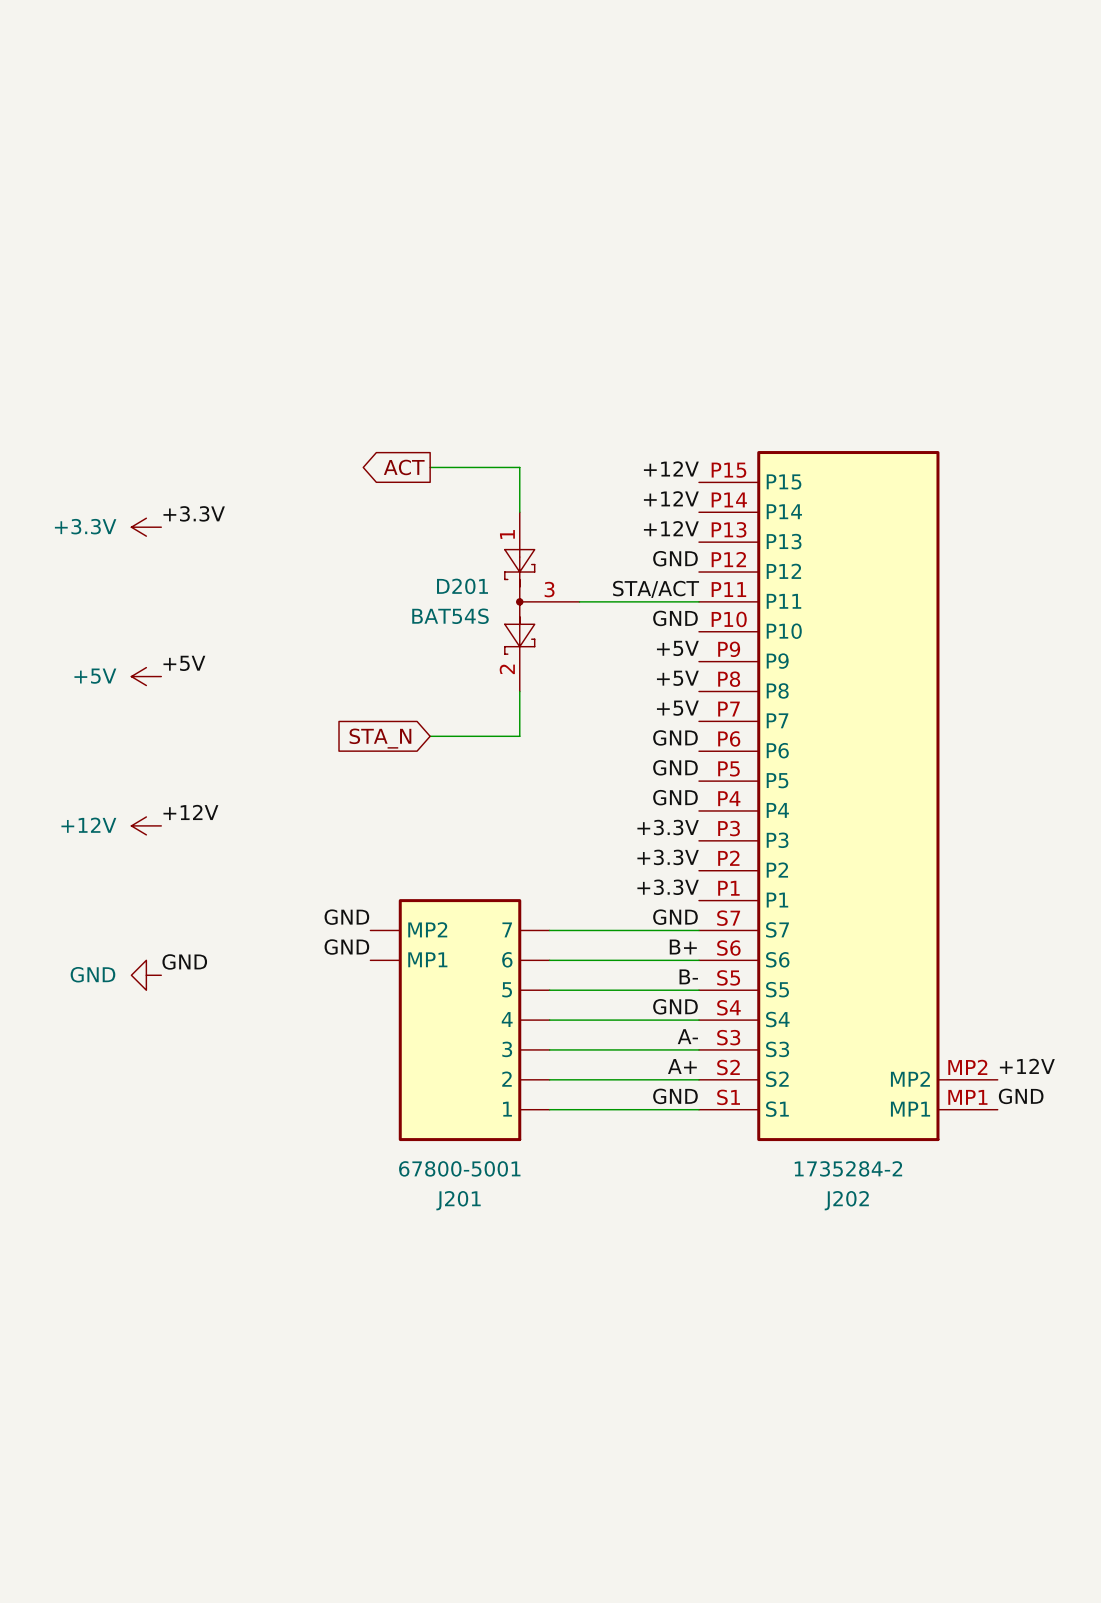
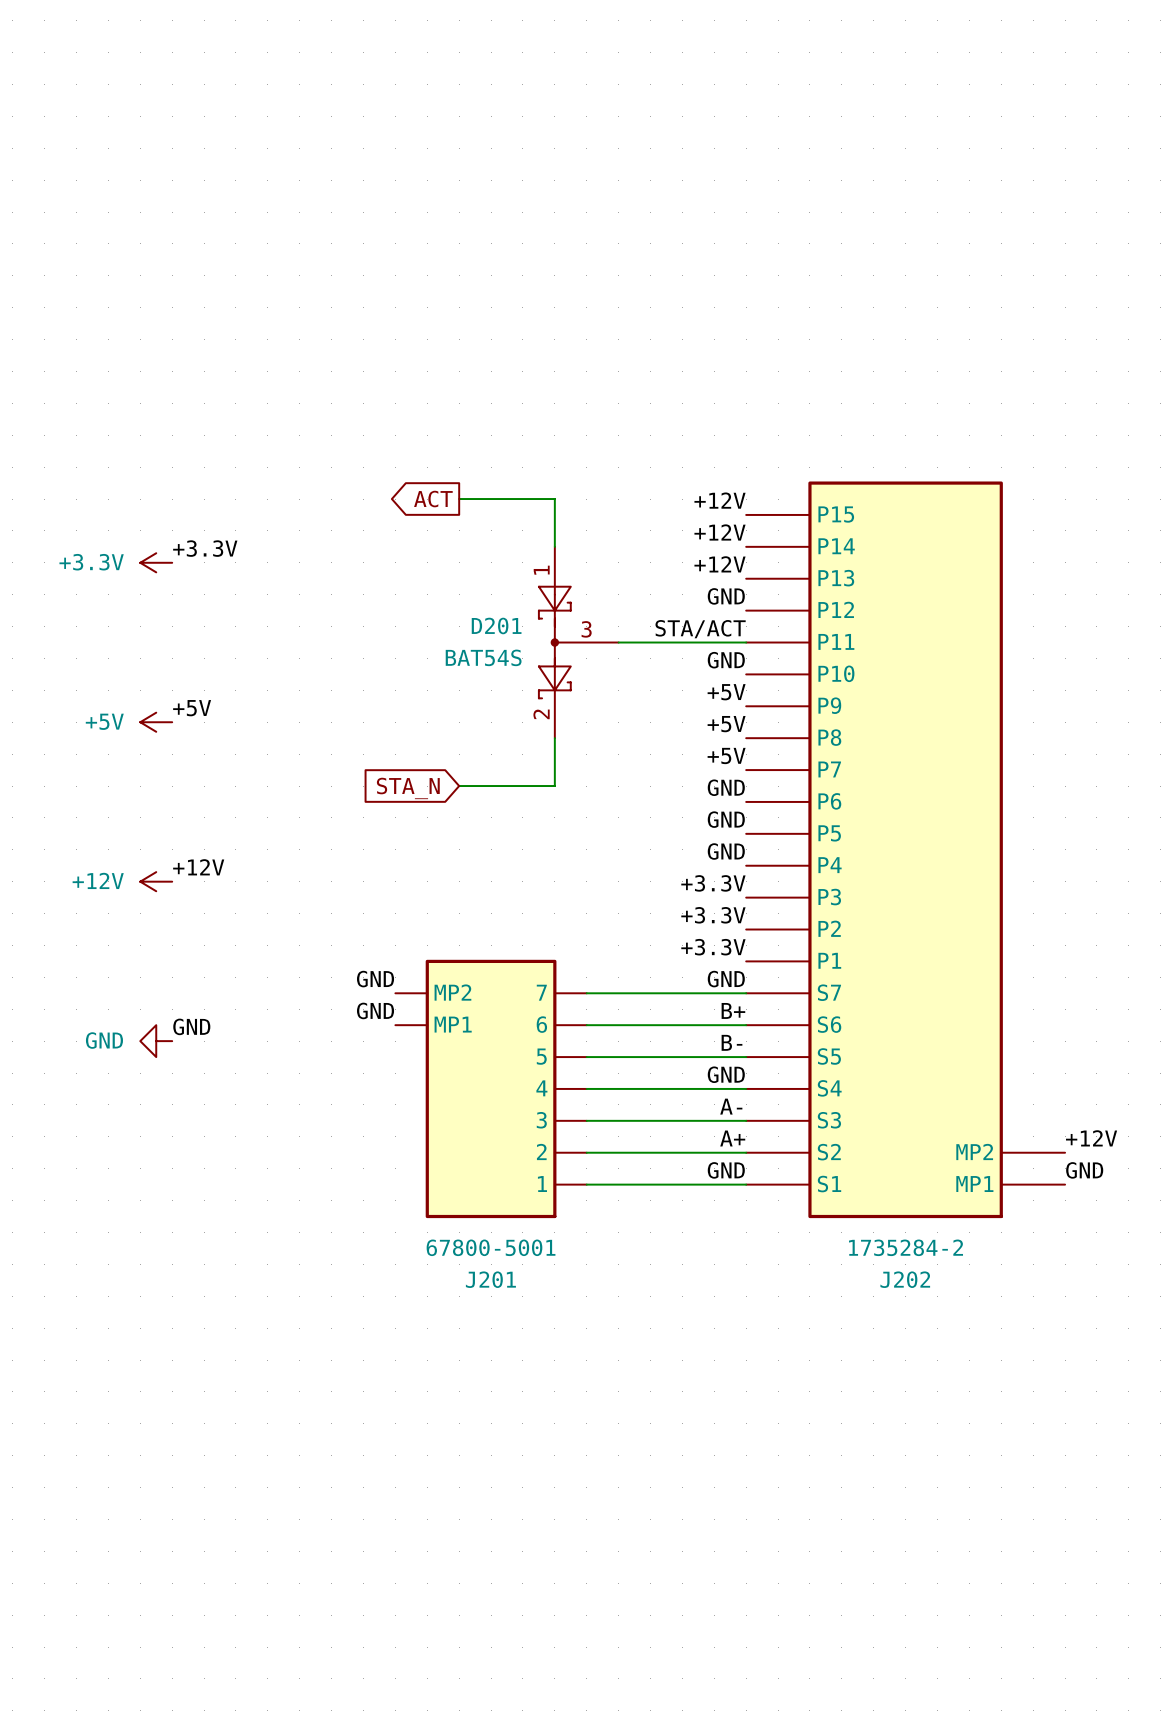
J202 symbol: [698, 451, 998, 1142] -> [746, 481, 1066, 1219]

